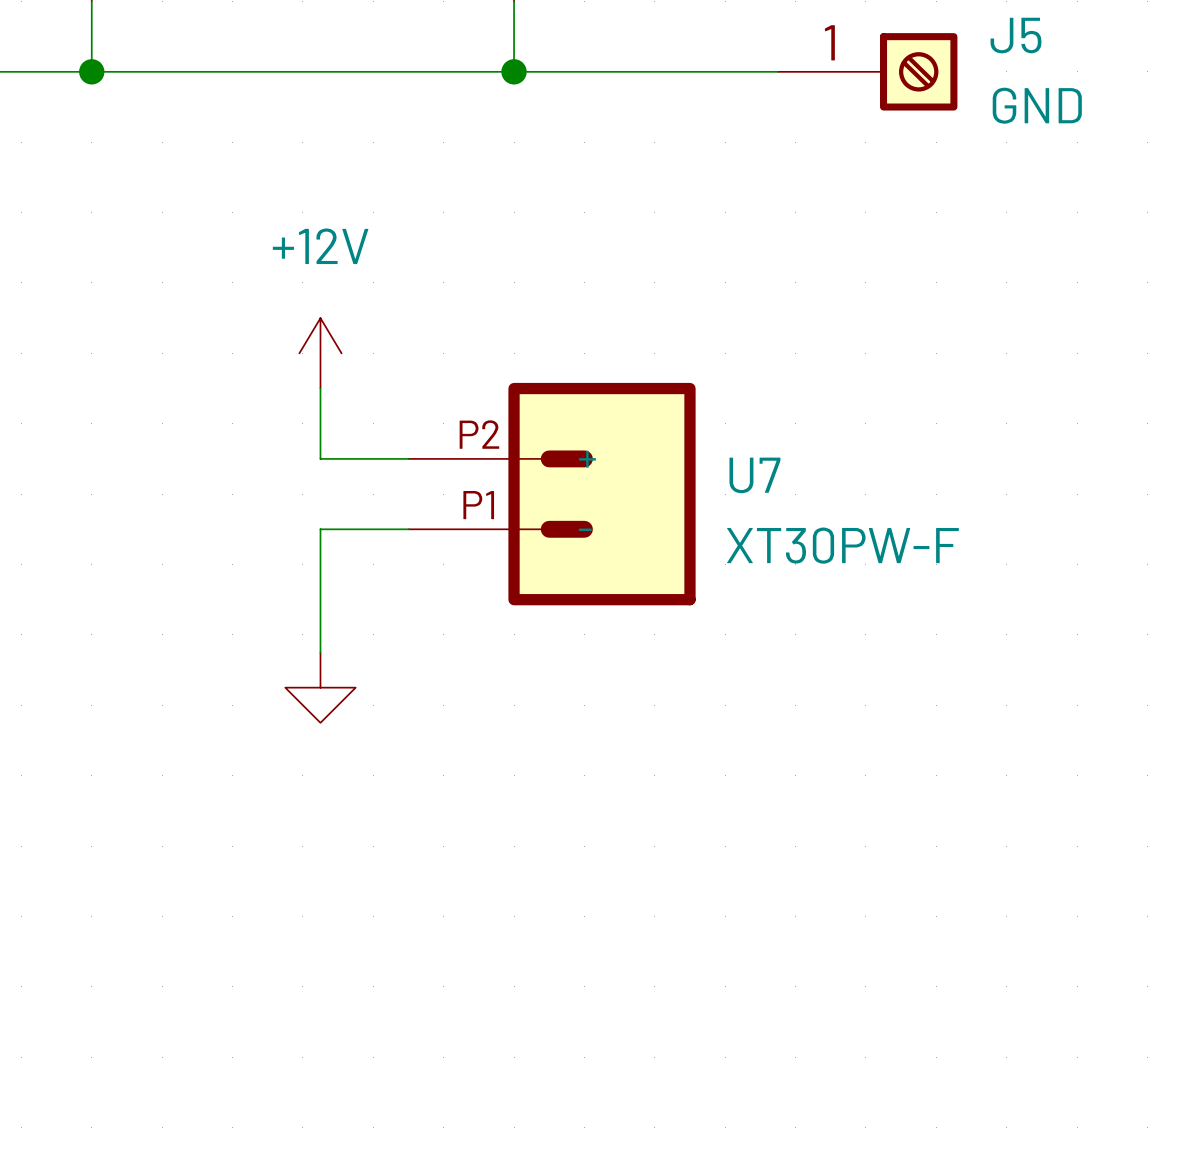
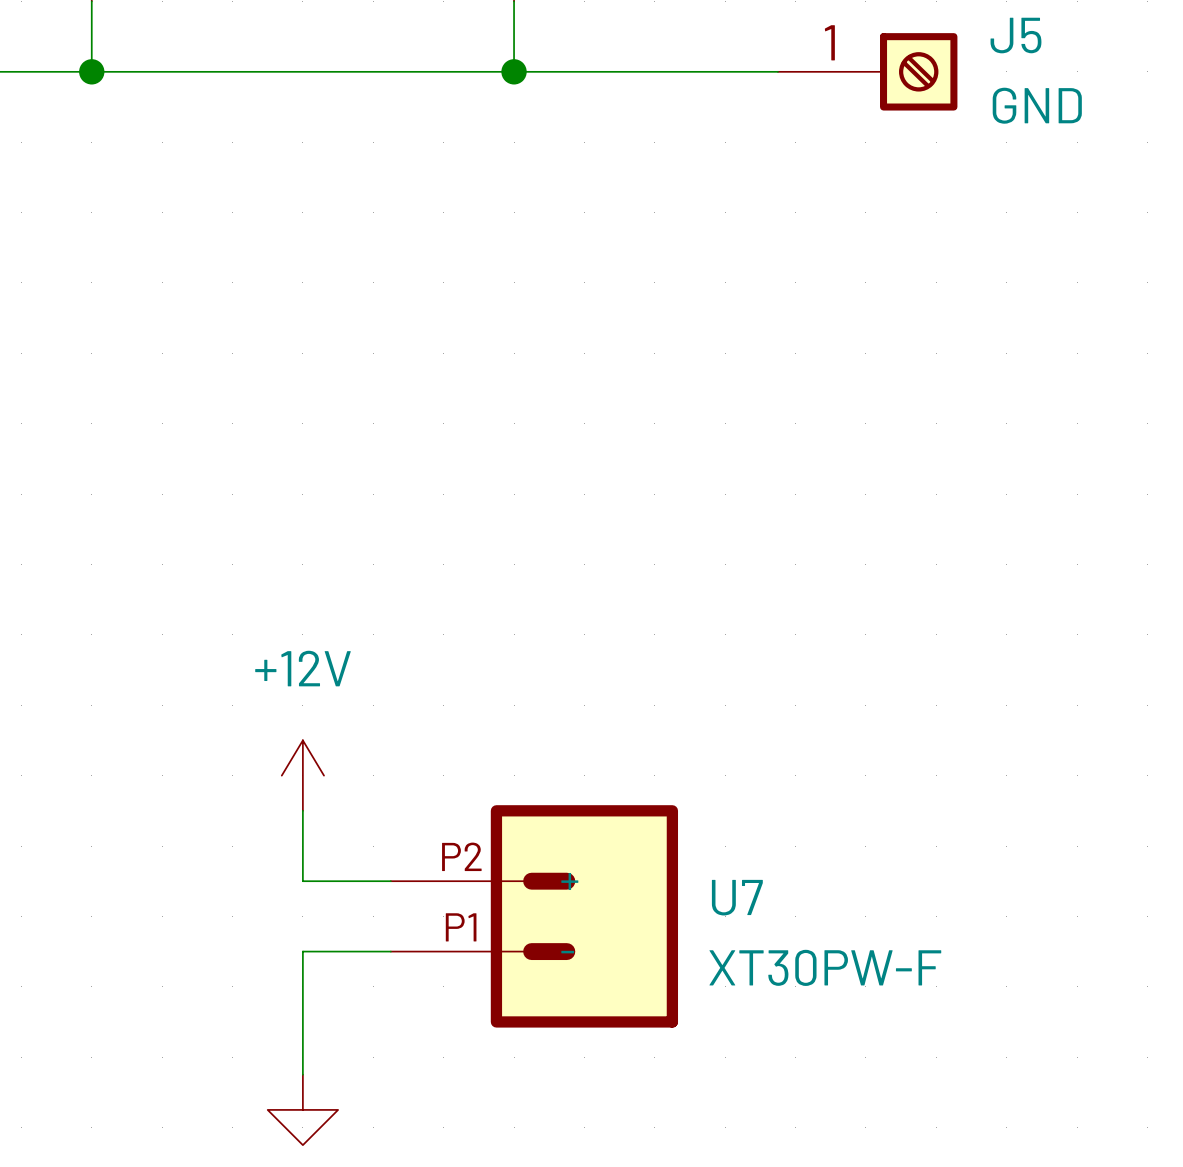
power symbol position: +12V (320, 353) -> +12V (302, 775)
wire: (320, 388) (320, 458) (408, 458) -> (302, 810) (302, 881) (390, 881)
U7 position: (552, 494) -> (534, 916)
wire: (408, 529) (320, 529) (320, 652) -> (390, 951) (302, 951) (302, 1074)
power symbol position: (320, 687) -> (302, 1109)

